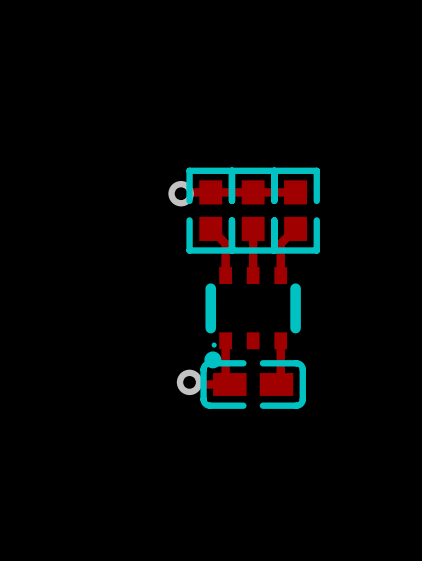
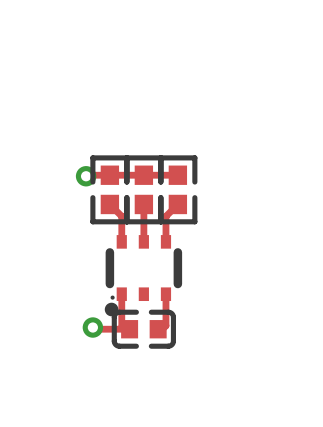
part footprint: [200, 360, 306, 409] -> [111, 309, 177, 349]

